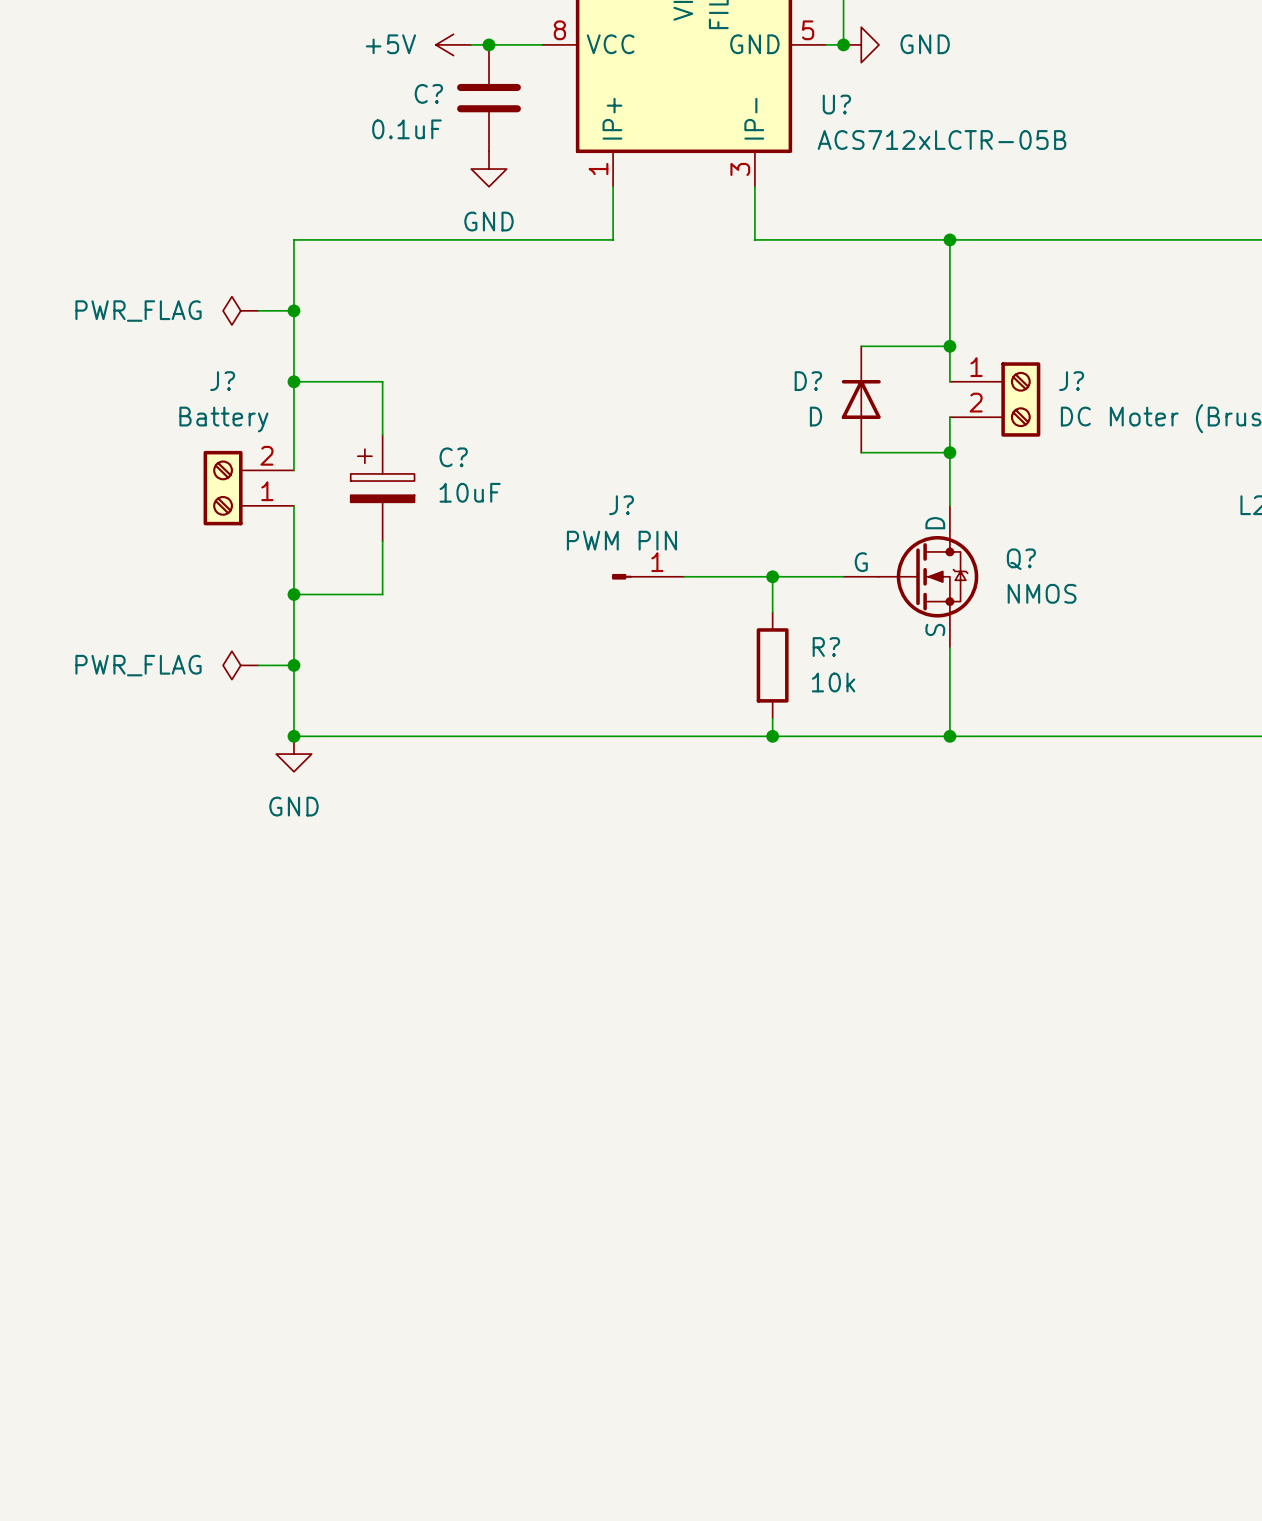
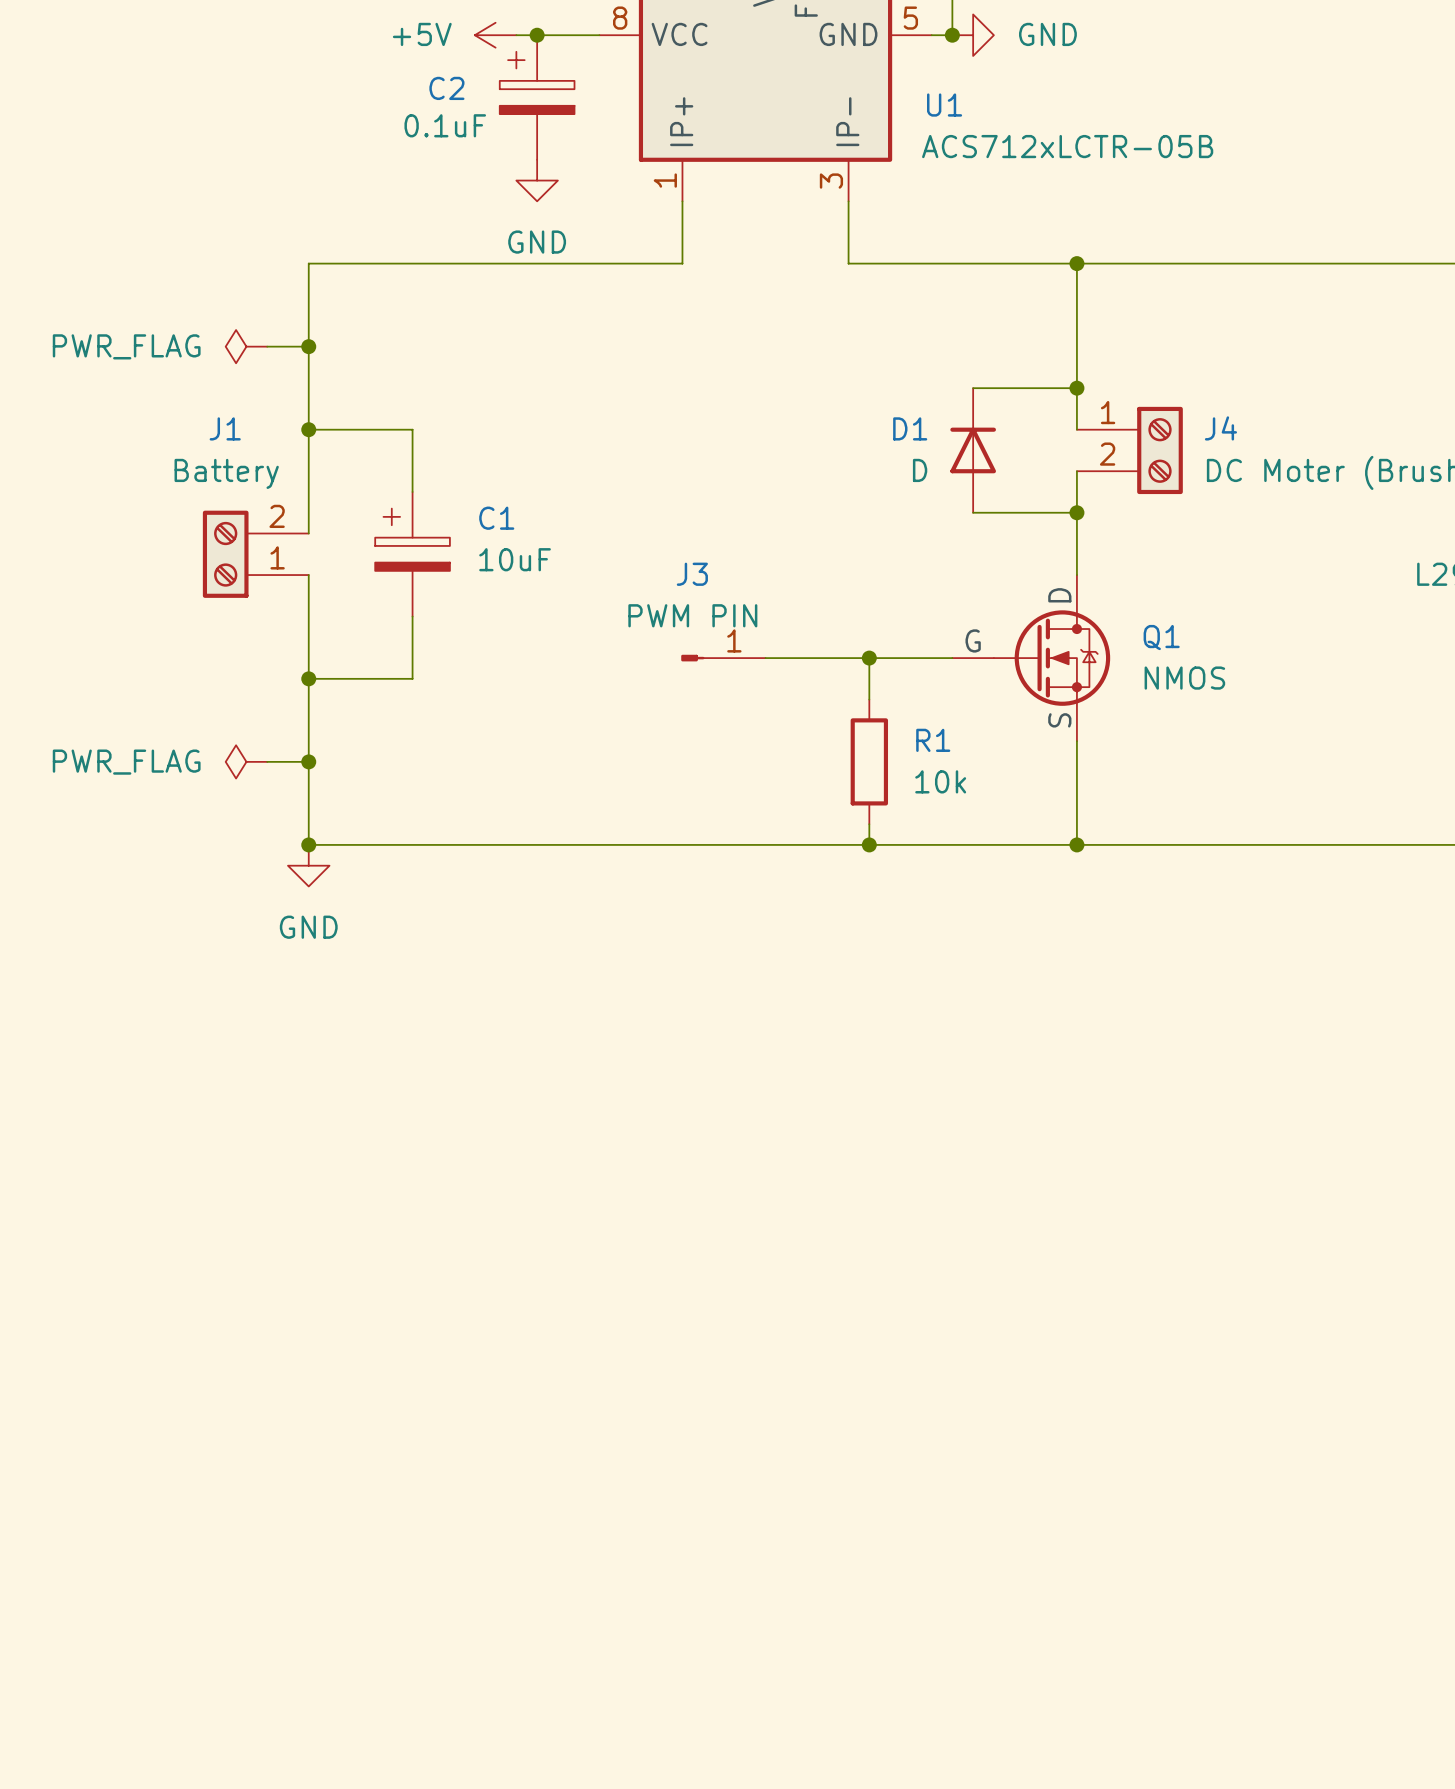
C?: 0.1uF (488, 98) -> none
C2: none -> 0.1uF (537, 97)
U? name: U? (836, 104) -> U1 (944, 105)
J? name: J? (222, 381) -> J1 (225, 428)
D? name: D? (808, 381) -> D1 (910, 428)
J? name: J? (1071, 381) -> J4 (1220, 428)
C? name: C? (453, 457) -> C1 (496, 518)
J? name: J? (621, 505) -> J3 (692, 574)
Q? name: Q? (1021, 559) -> Q1 (1161, 637)
R? name: R? (826, 647) -> R1 (933, 740)

